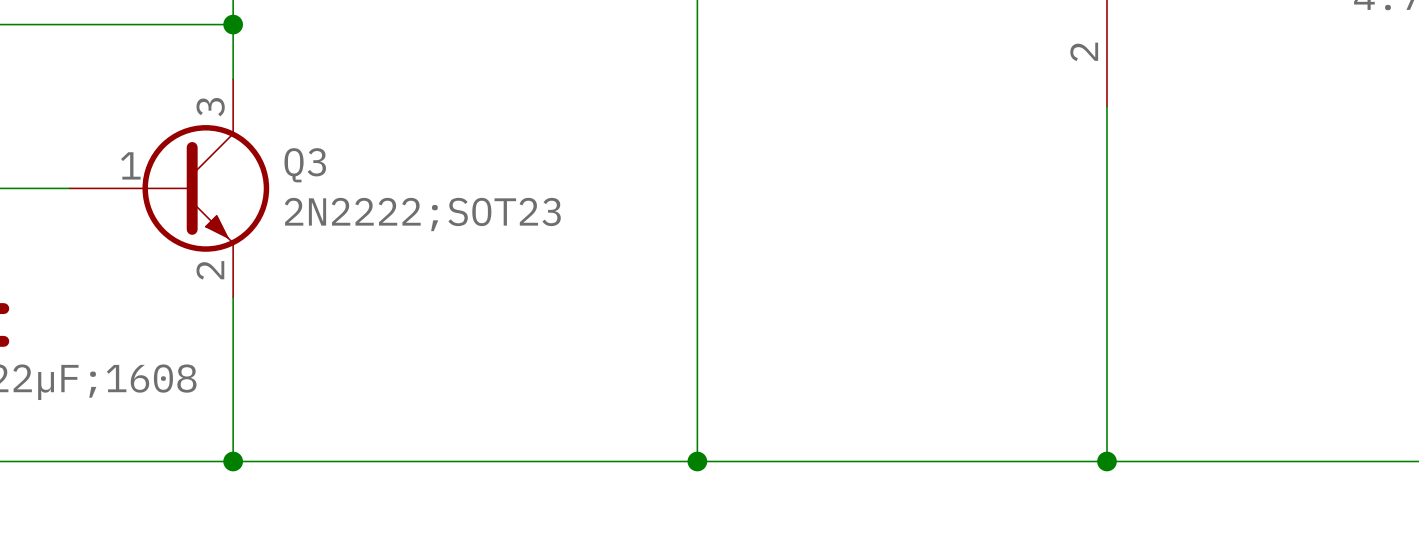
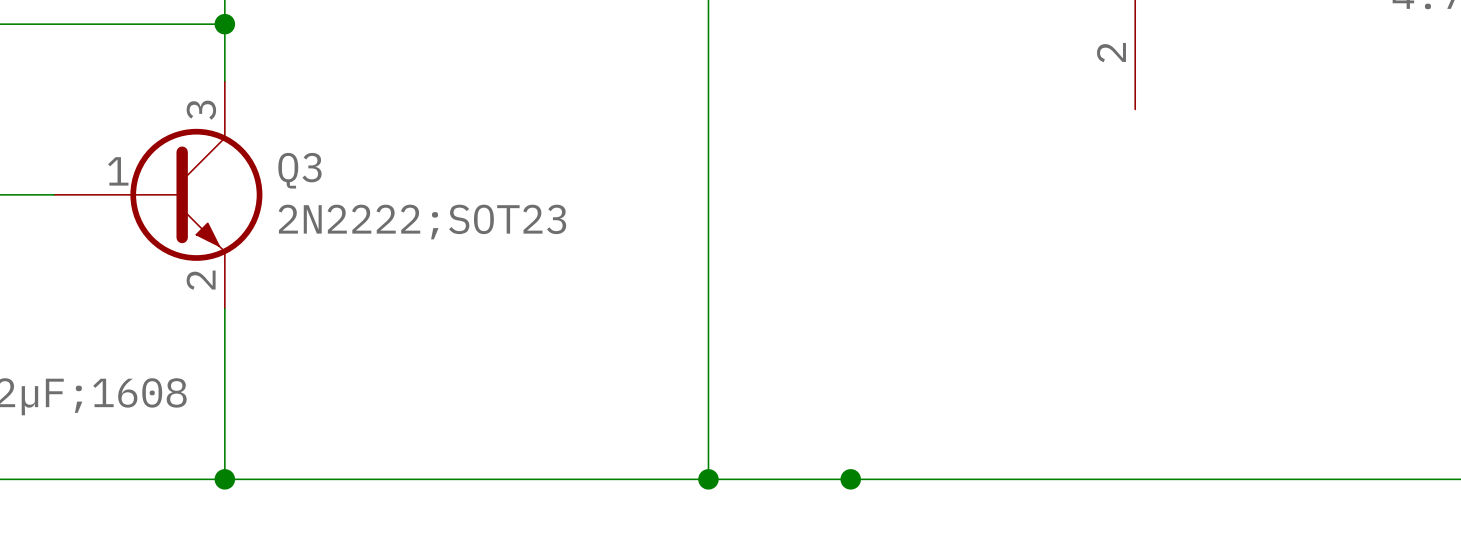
wire: (1106, 106) (1106, 461) -> none
junction: none -> (850, 479)
junction: (1106, 461) -> none

